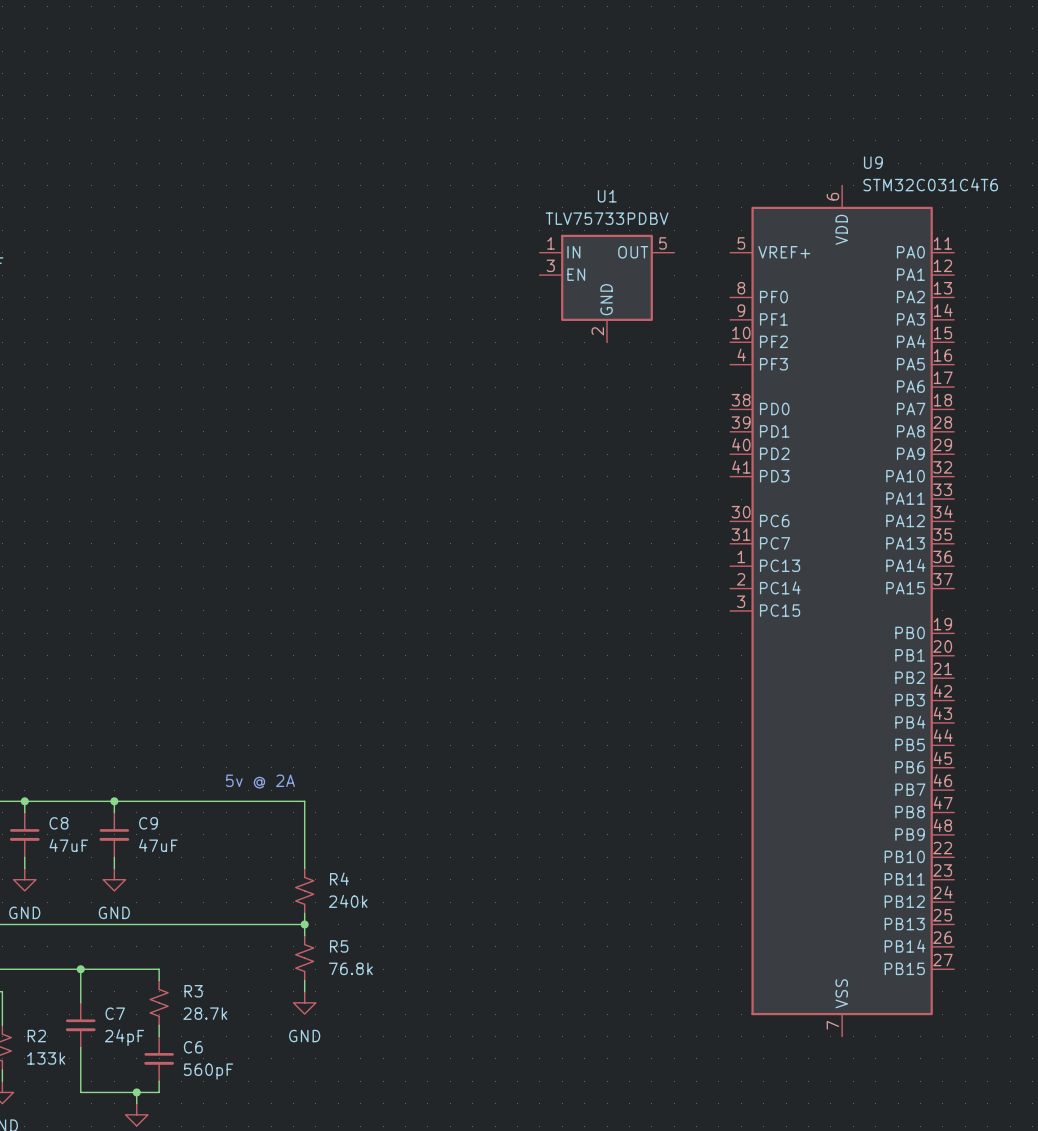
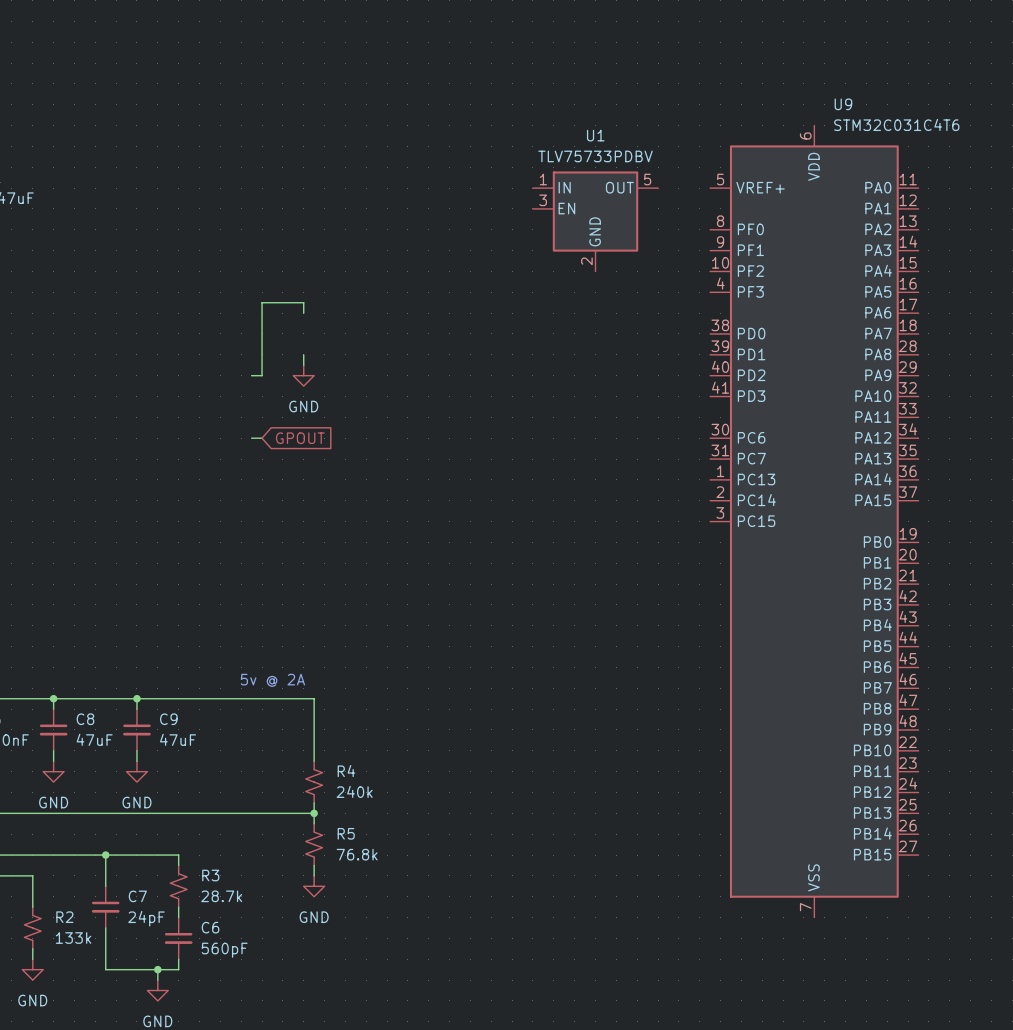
wire: none -> (303, 313) (303, 302) (262, 302) (262, 375) (251, 375)
wire: none -> (303, 354) (303, 365)
power symbol: none -> GND (303, 375)
wire: none -> (251, 438) (262, 438)
global label: none -> GPOUT (300, 438)

